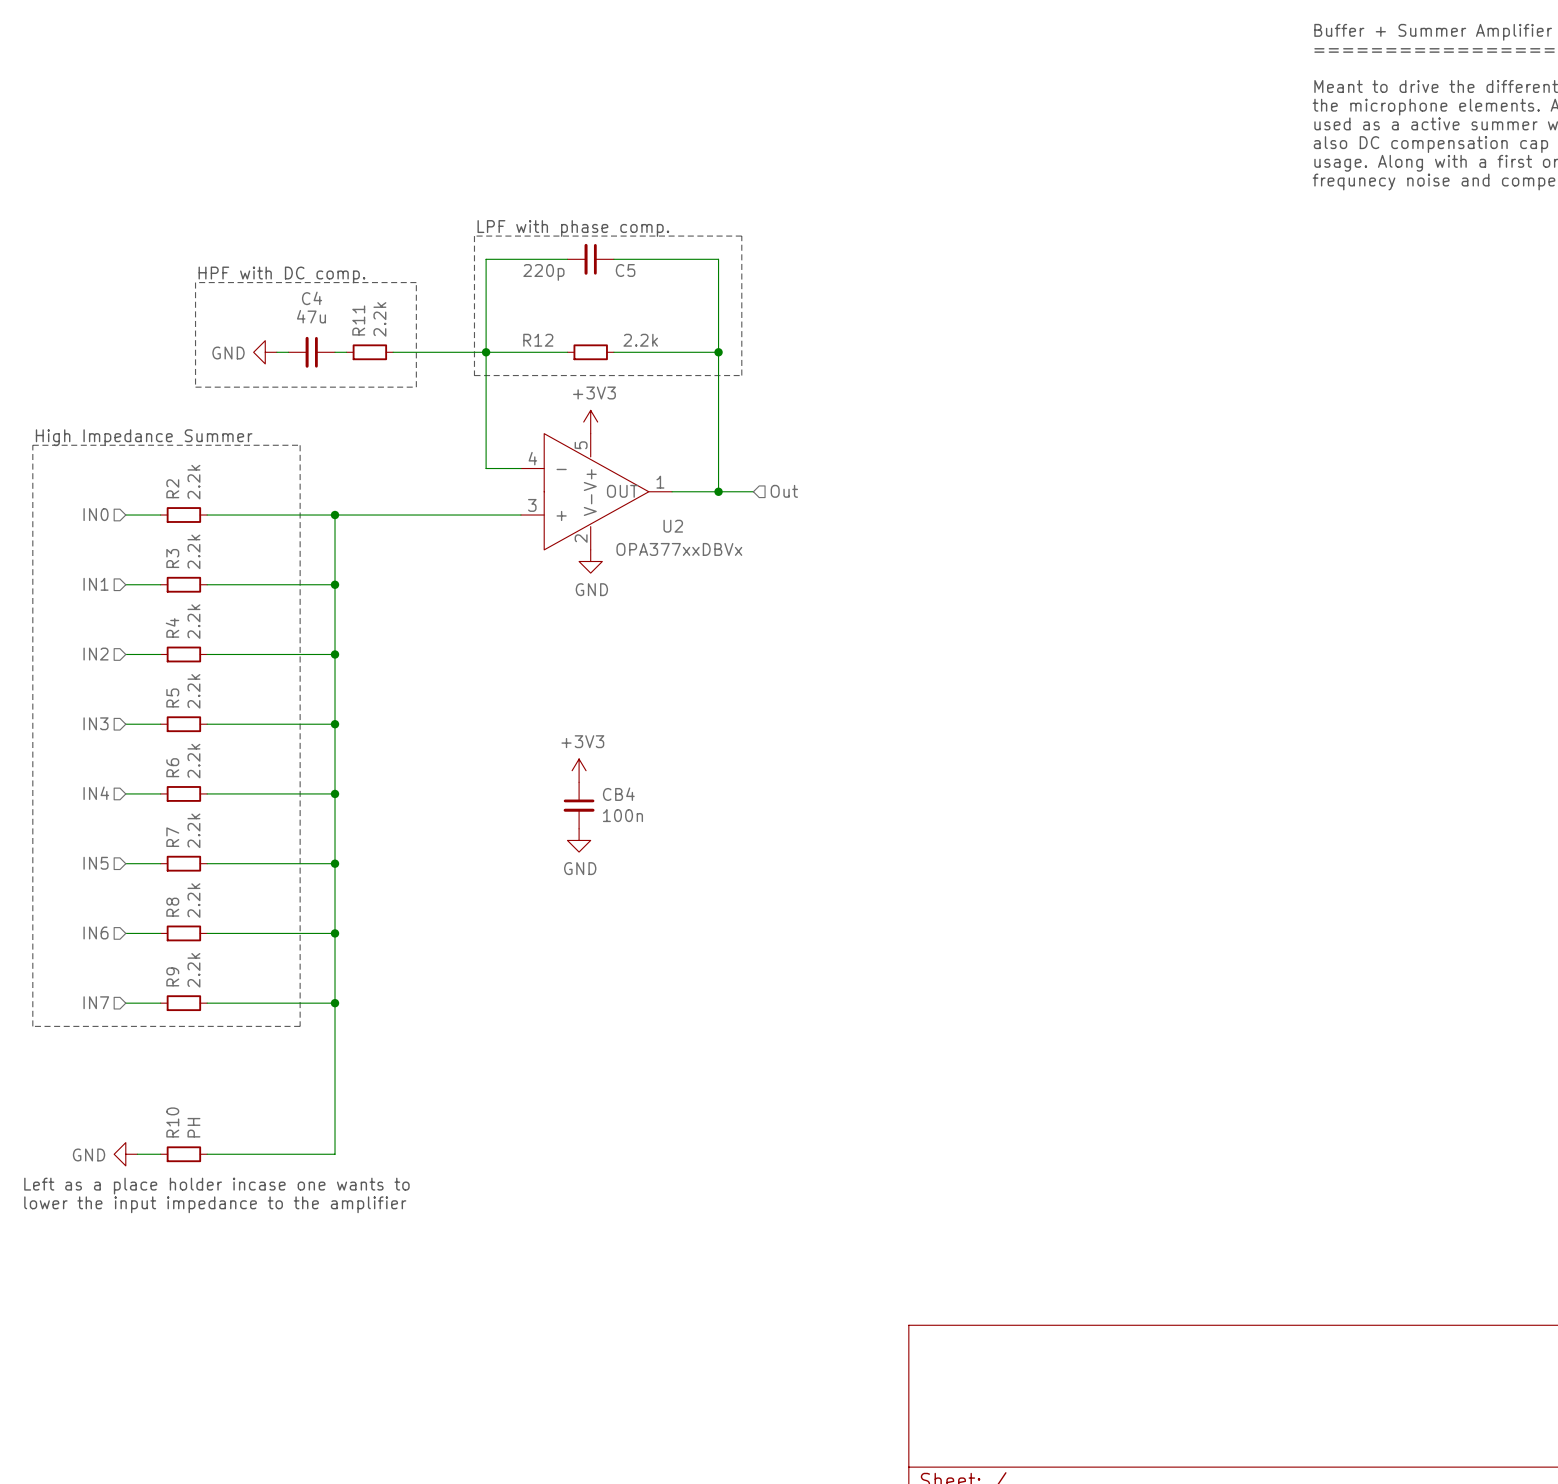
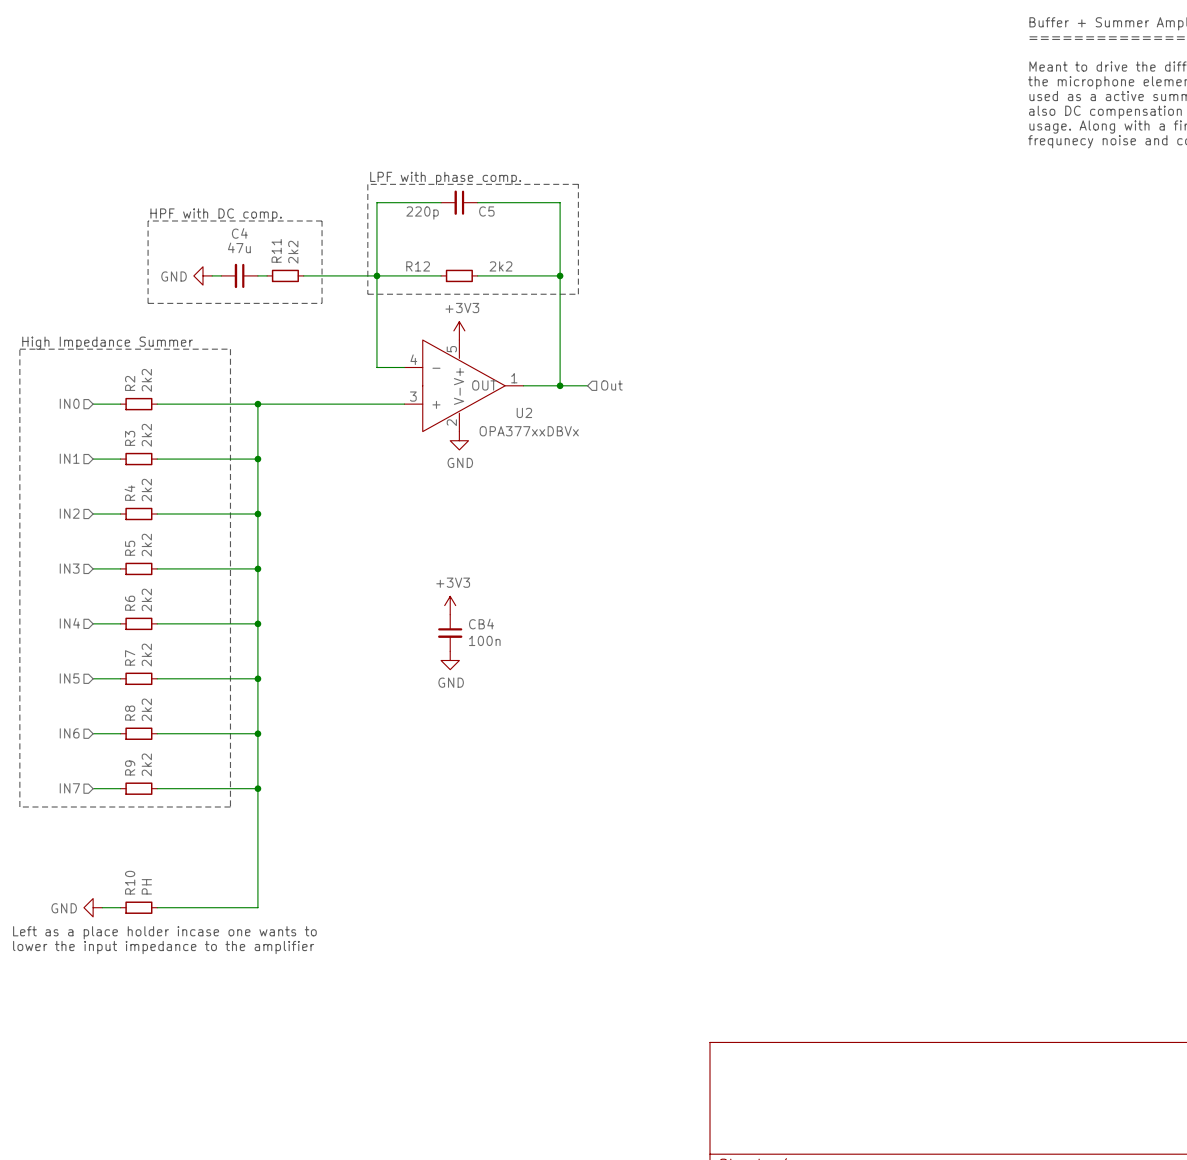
R11 value: 2.2k (379, 319) -> 2k2 (293, 252)
R12 value: 2.2k (640, 340) -> 2k2 (500, 266)
R2 value: 2.2k (193, 482) -> 2k2 (146, 380)
R3 value: 2.2k (193, 551) -> 2k2 (146, 435)
R4 value: 2.2k (193, 621) -> 2k2 (146, 490)
R5 value: 2.2k (193, 691) -> 2k2 (146, 545)
R6 value: 2.2k (193, 761) -> 2k2 (146, 600)
R7 value: 2.2k (193, 830) -> 2k2 (146, 655)
R8 value: 2.2k (193, 900) -> 2k2 (146, 710)
R9 value: 2.2k (193, 970) -> 2k2 (146, 764)

